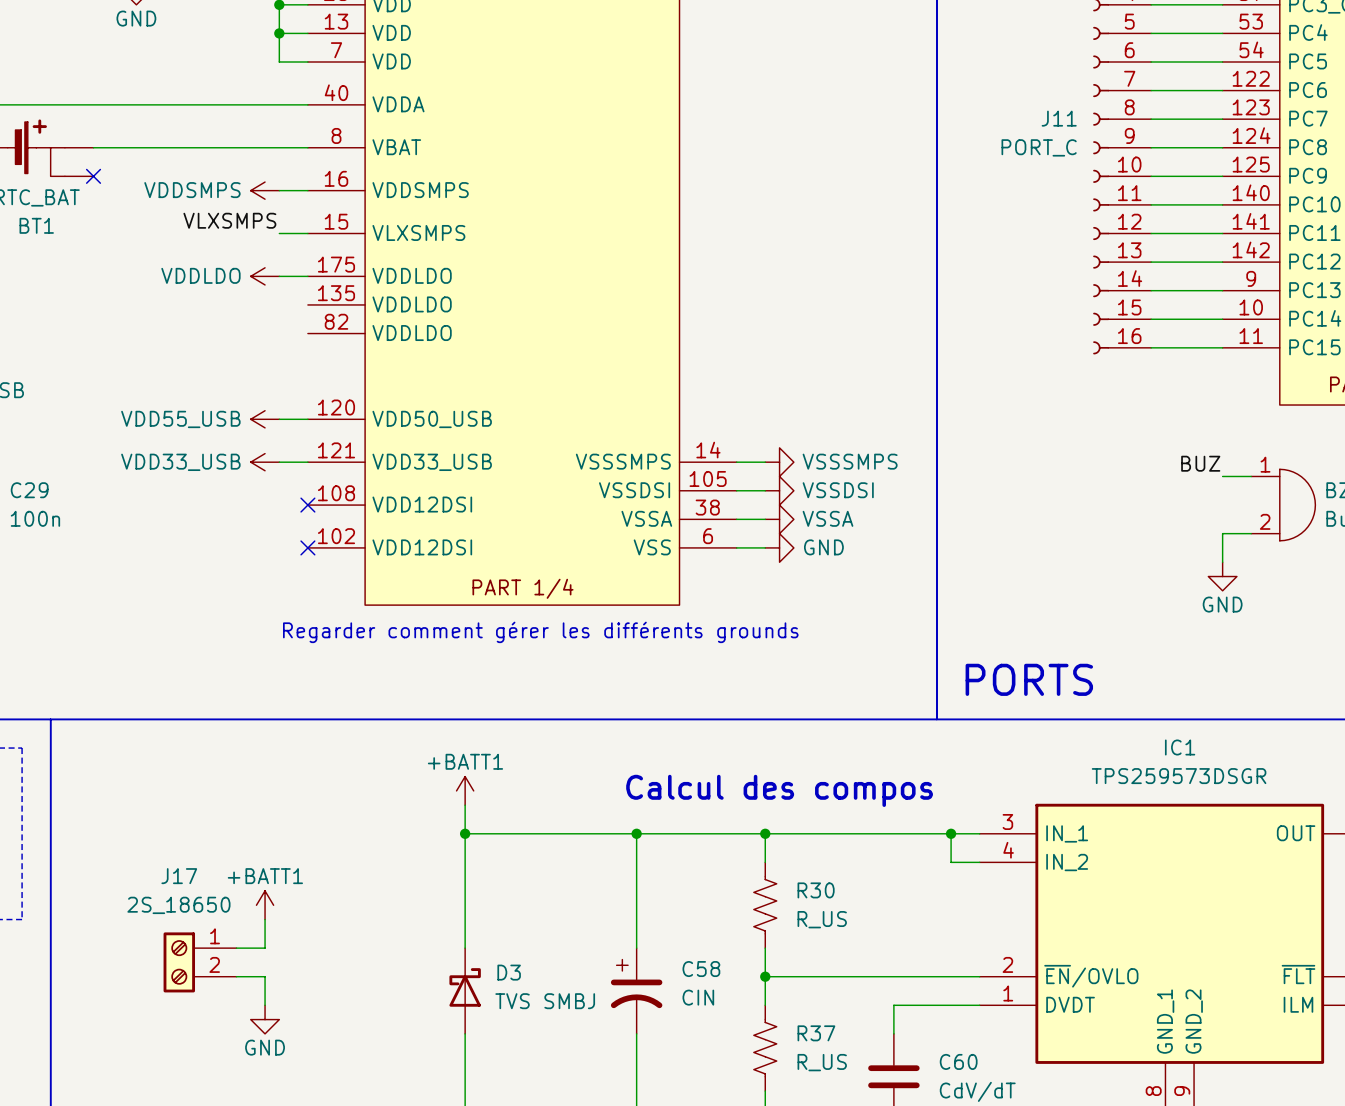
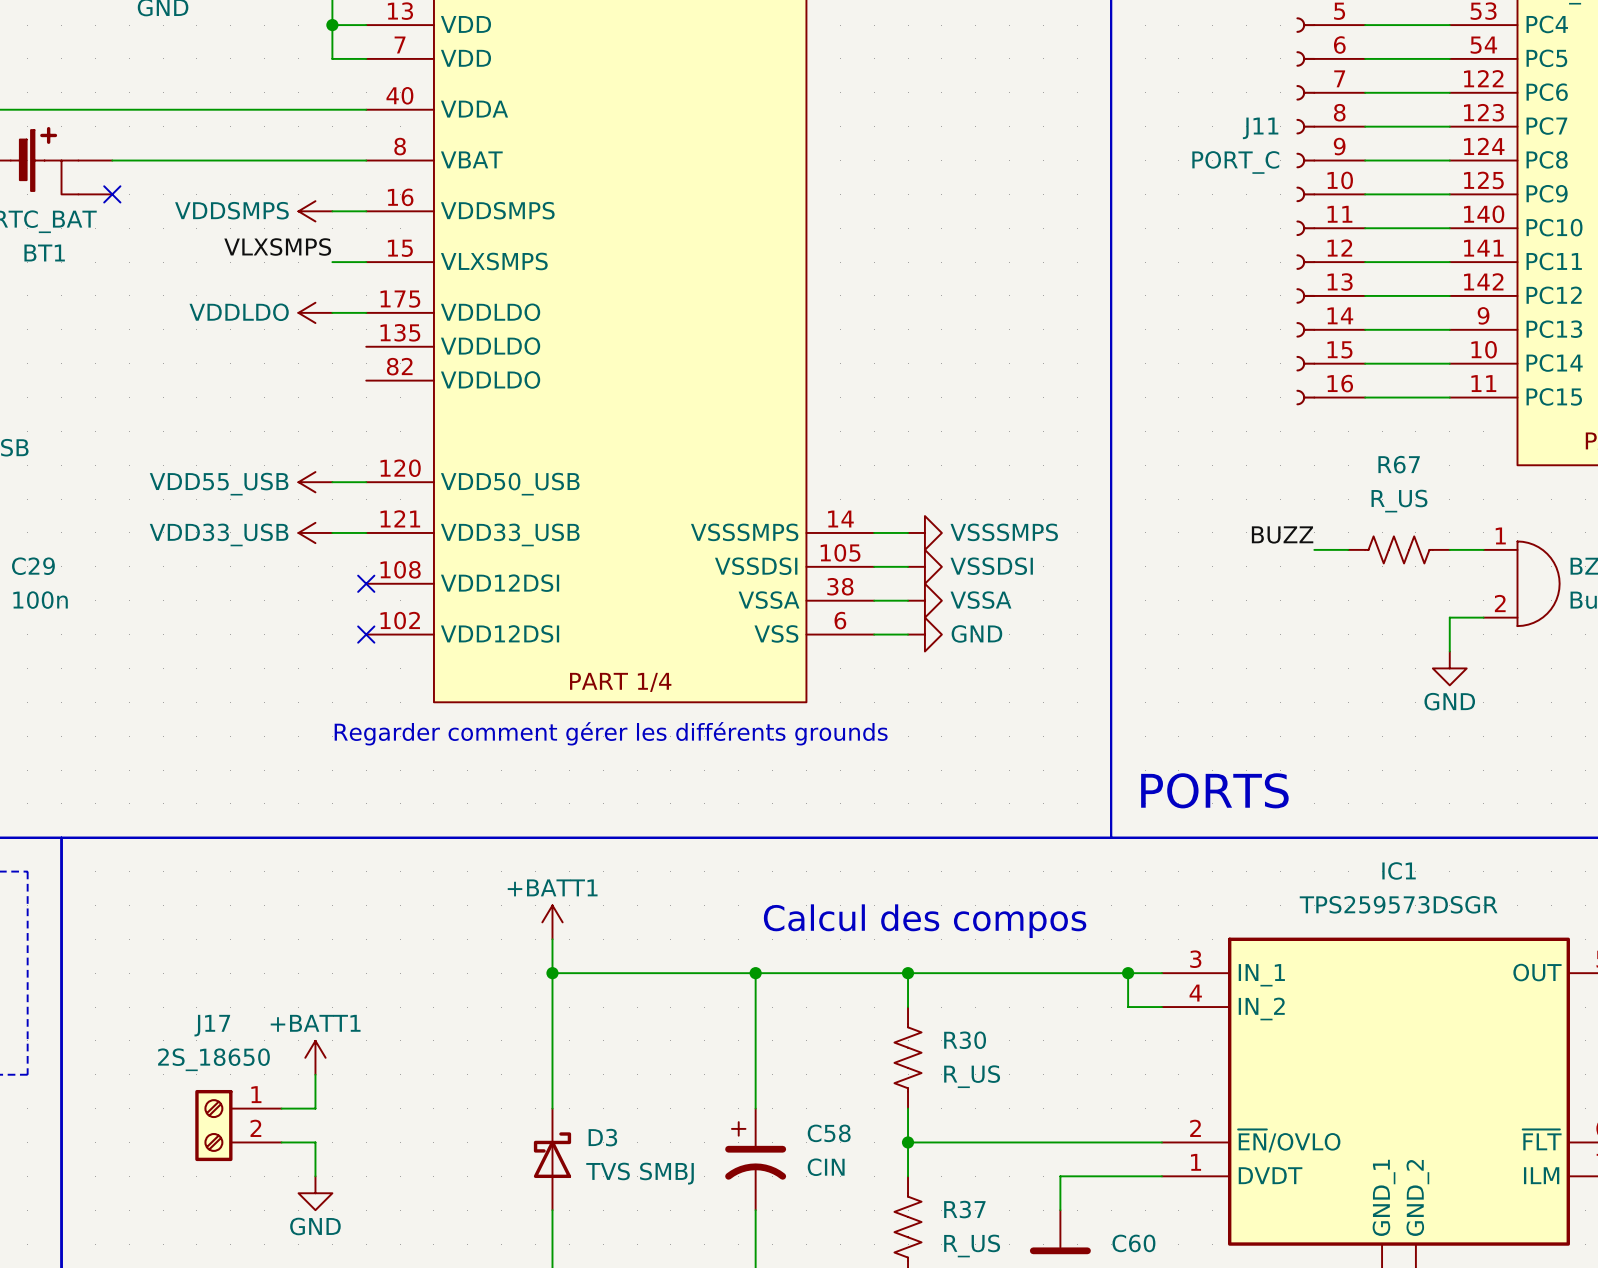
label: none -> BUZZ (1282, 534)
label: BUZ (1200, 463) -> none
wire: none -> (1314, 549) (1348, 549)
R67: none -> R_US (1398, 549)

